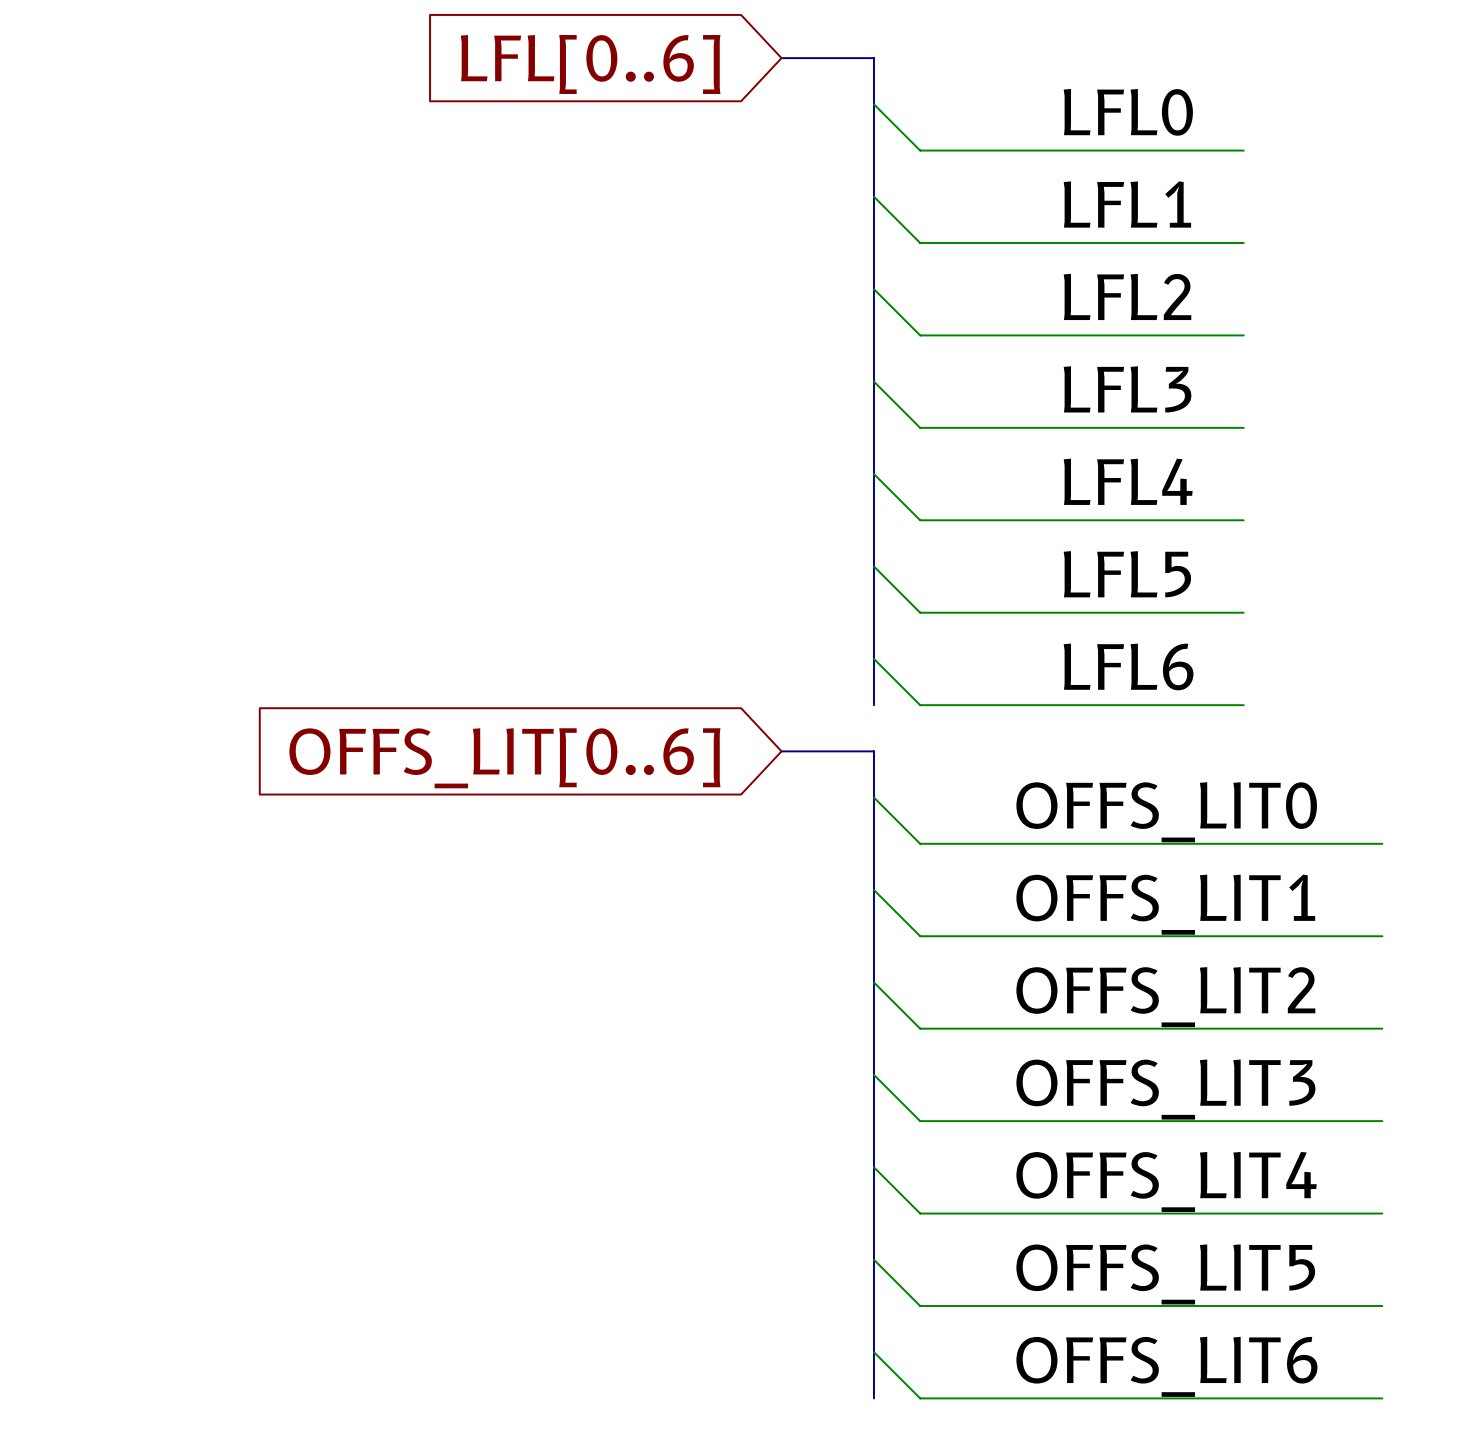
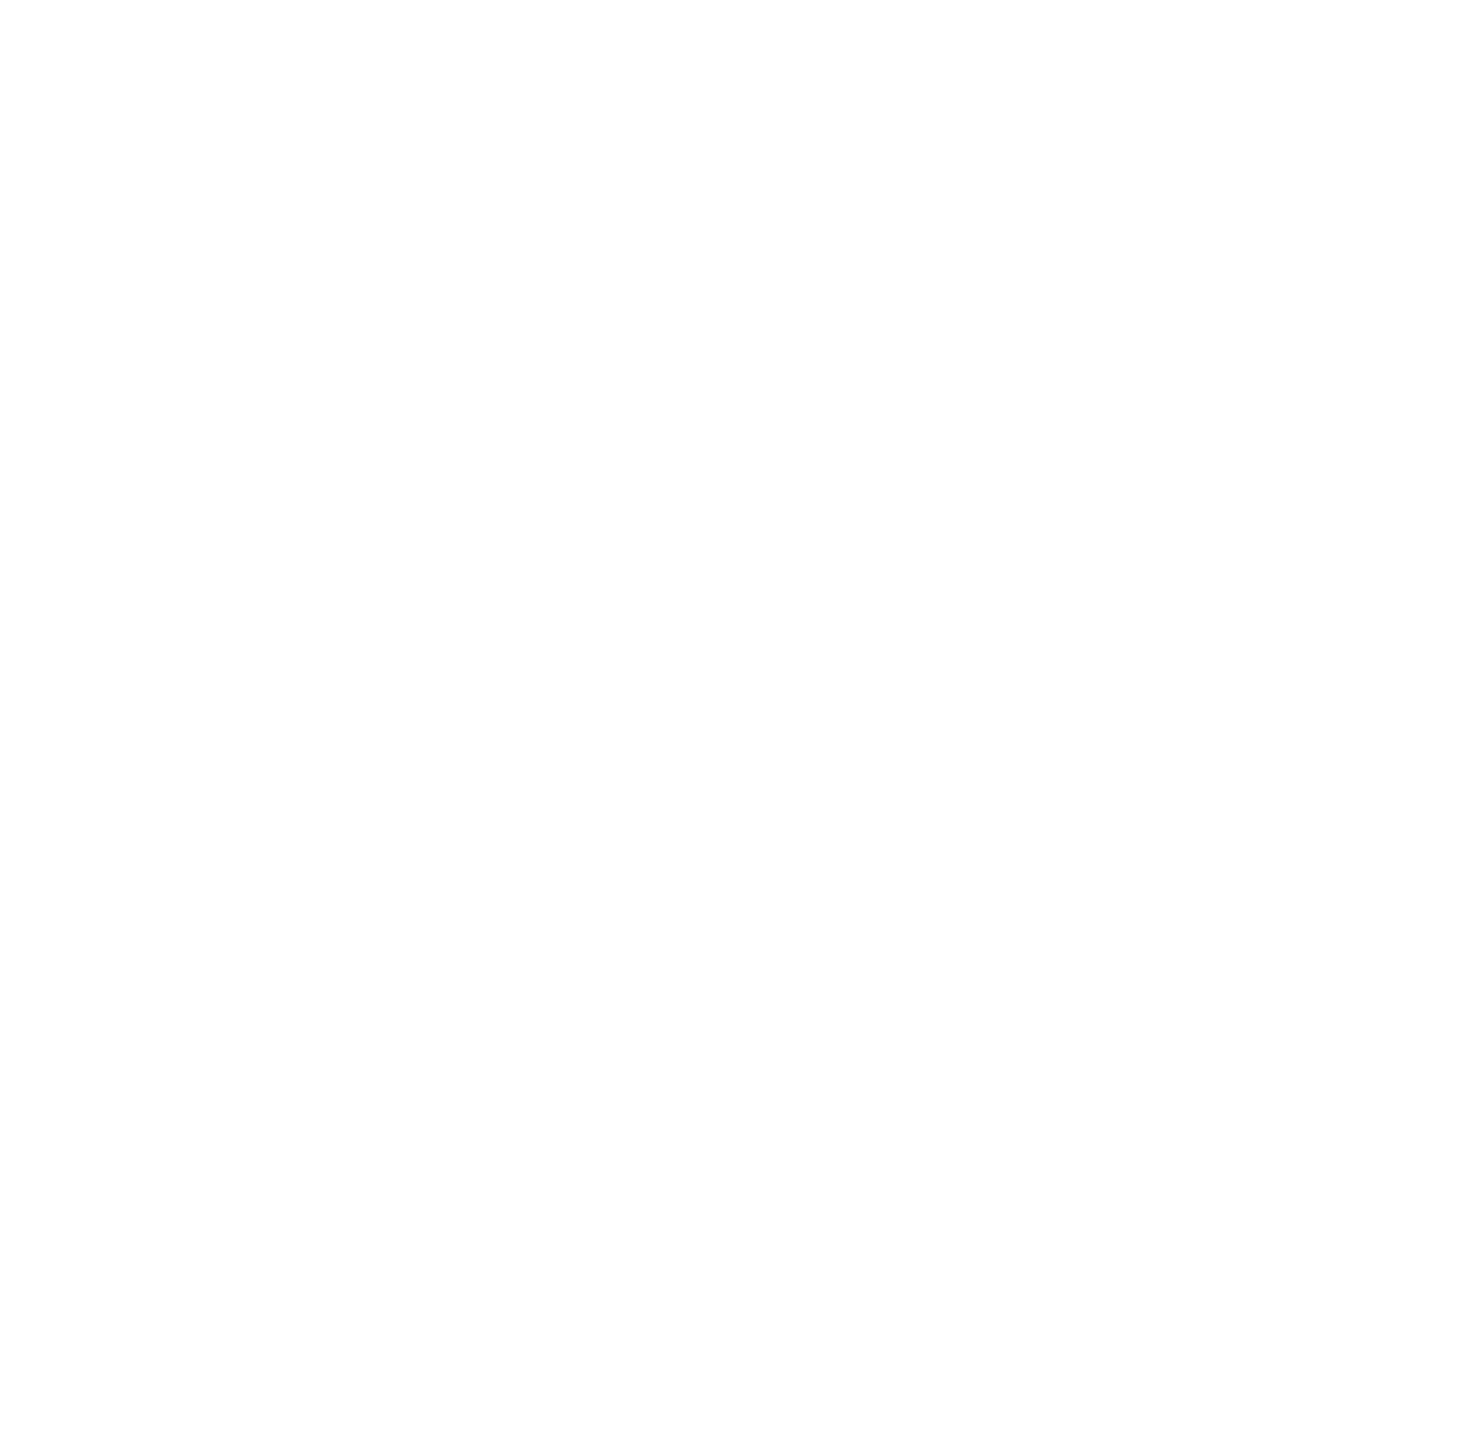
bus: (781, 58) (873, 58) (873, 705) -> none
global label: LFL[0..6] (590, 64) -> none
wire: (873, 104) (920, 150) (1243, 150) -> none
label: LFL0 (1128, 112) -> none
wire: (873, 196) (920, 242) (1243, 242) -> none
label: LFL1 (1127, 204) -> none
wire: (873, 289) (920, 335) (1243, 335) -> none
label: LFL2 (1127, 296) -> none
wire: (873, 381) (920, 427) (1243, 427) -> none
label: LFL3 (1127, 389) -> none
wire: (873, 474) (920, 520) (1243, 520) -> none
label: LFL4 (1128, 481) -> none
wire: (873, 566) (920, 612) (1243, 612) -> none
label: LFL5 (1127, 574) -> none
wire: (873, 658) (920, 705) (1243, 705) -> none
label: LFL6 (1128, 666) -> none
bus: (781, 751) (873, 751) (873, 1398) -> none
global label: OFFS_LIT[0..6] (504, 758) -> none
wire: (873, 797) (920, 843) (1382, 843) -> none
label: OFFS_LIT0 (1166, 812) -> none
wire: (873, 890) (920, 936) (1382, 936) -> none
label: OFFS_LIT1 (1165, 904) -> none
wire: (873, 982) (920, 1028) (1382, 1028) -> none
label: OFFS_LIT2 (1165, 997) -> none
wire: (873, 1074) (920, 1121) (1382, 1121) -> none
label: OFFS_LIT3 (1165, 1089) -> none
wire: (873, 1167) (920, 1213) (1382, 1213) -> none
label: OFFS_LIT4 (1166, 1181) -> none
wire: (873, 1259) (920, 1305) (1382, 1305) -> none
label: OFFS_LIT5 (1165, 1274) -> none
wire: (873, 1352) (920, 1398) (1382, 1398) -> none
label: OFFS_LIT6 (1166, 1366) -> none

